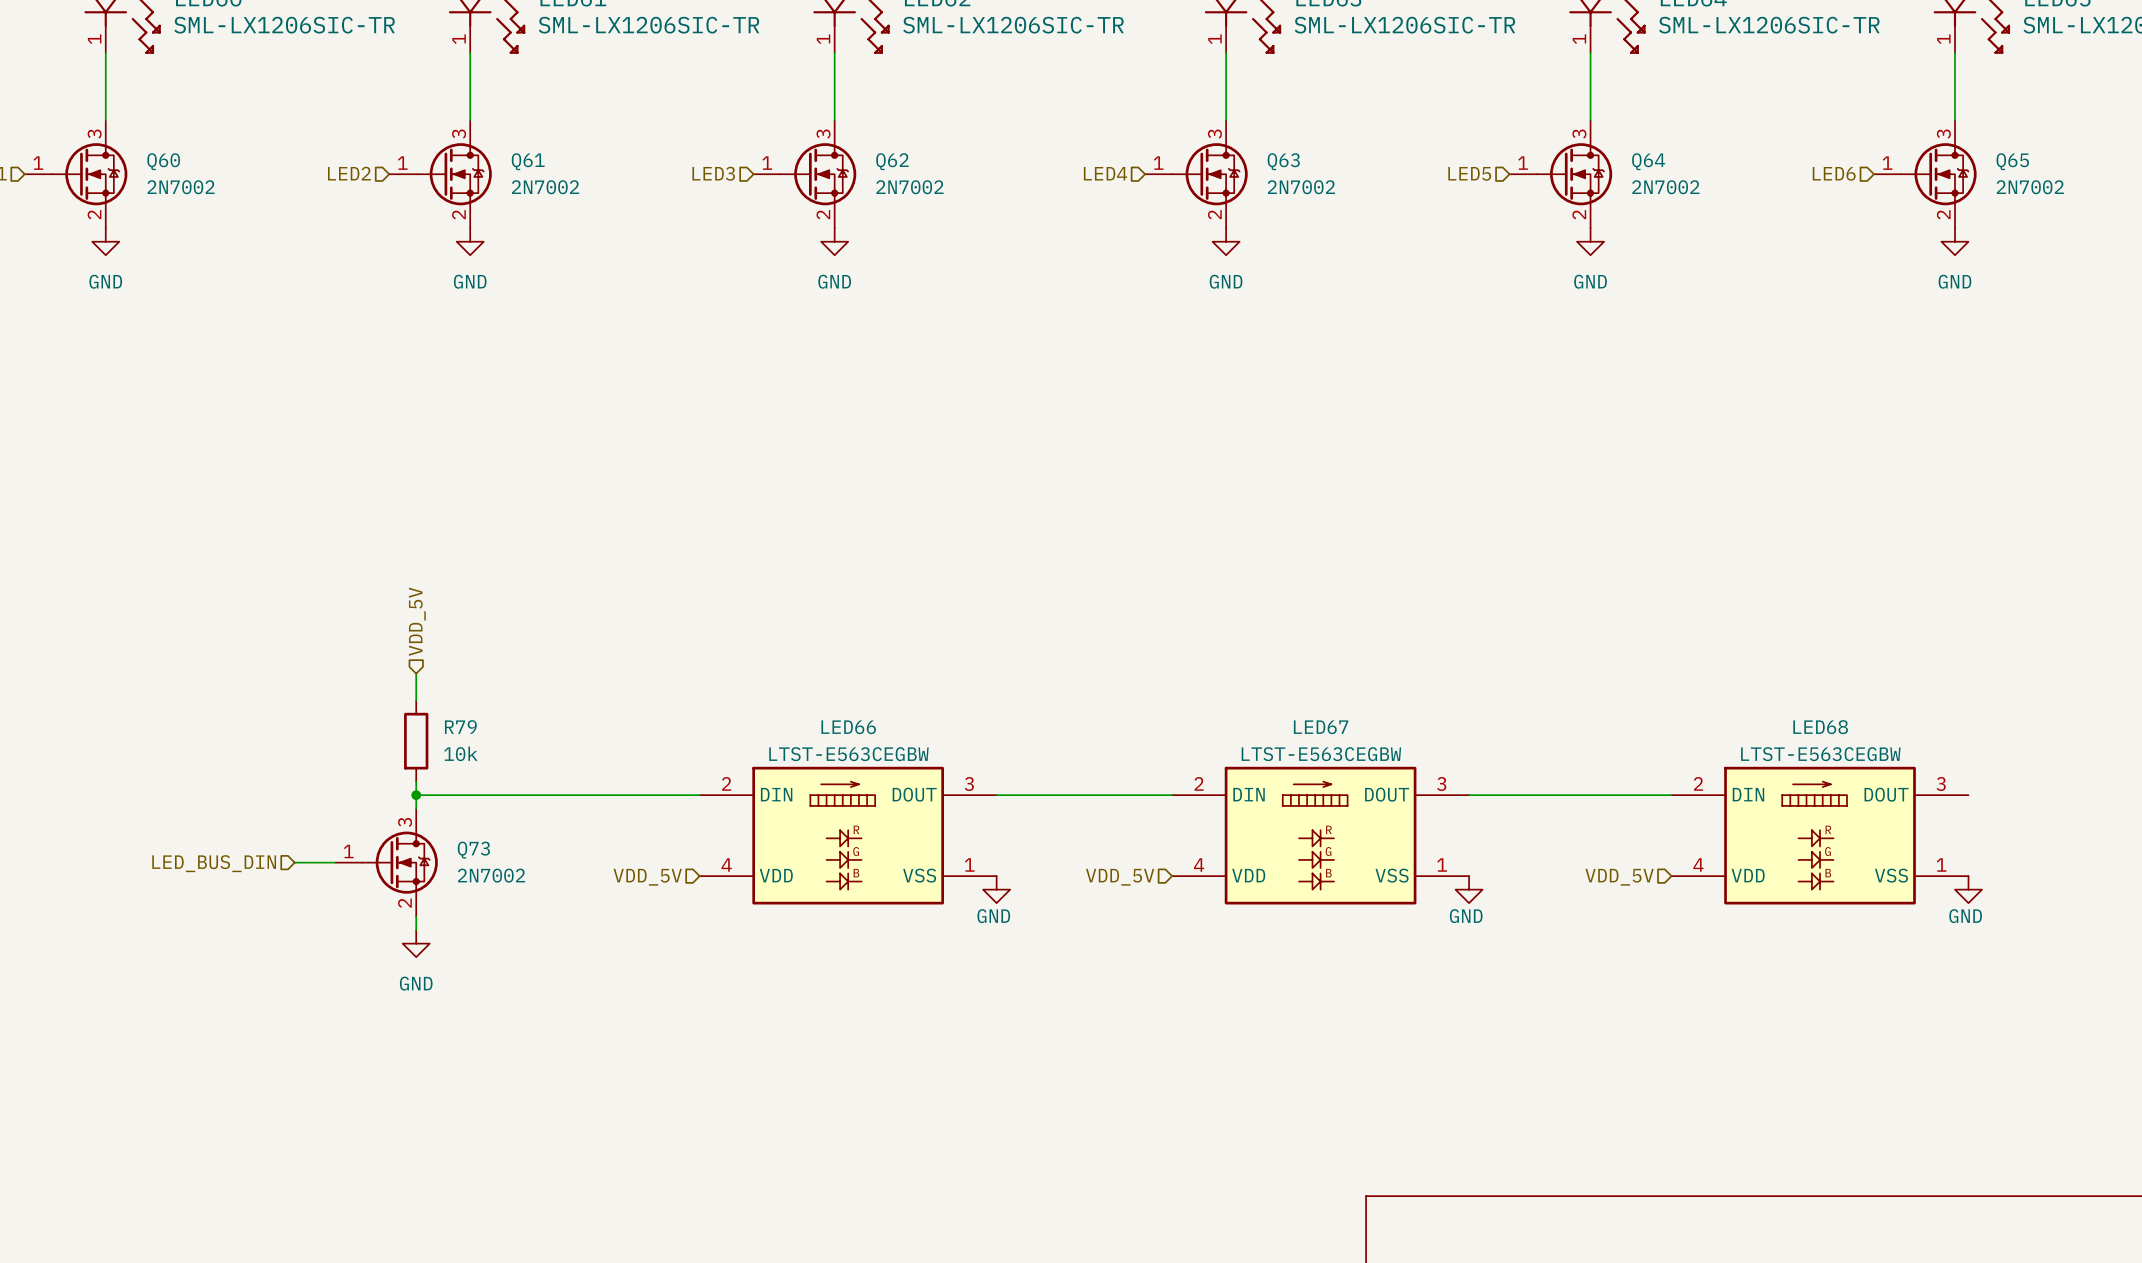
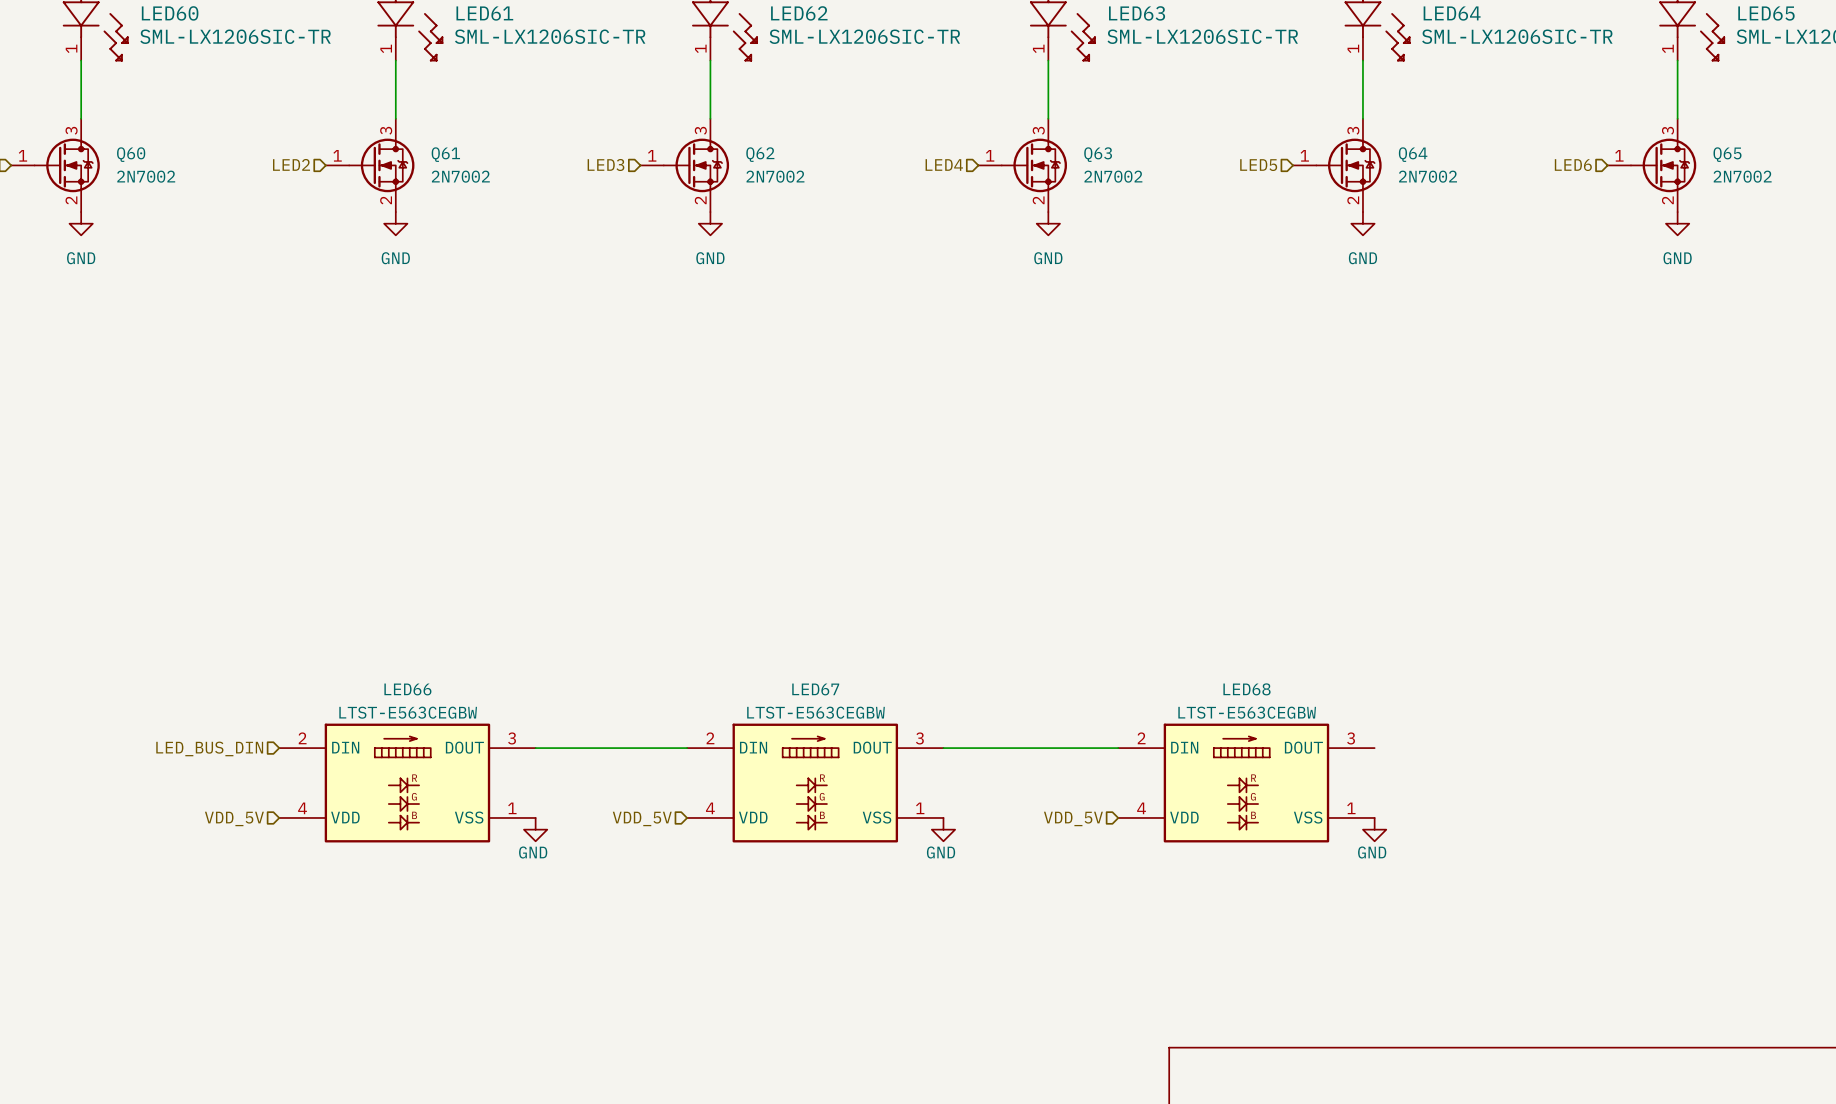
hierarchical label: VDD_5V (417, 621) -> none
wire: (416, 673) (416, 700) -> none
R79: 10k (416, 741) -> none
wire: (416, 781) (416, 808) -> none
wire: (416, 795) (699, 795) -> none
junction: (416, 795) -> none
wire: (996, 795) (1172, 795) -> none
wire: (1469, 795) (1671, 795) -> none
LED66 position: (848, 835) -> (407, 783)
LED67 position: (1320, 835) -> (815, 783)
LED68 position: (1820, 835) -> (1246, 783)
wire: none -> (535, 748) (687, 748)
wire: none -> (943, 748) (1118, 748)
wire: (294, 862) (335, 862) -> none
Q73: 2N7002 (386, 862) -> none
hierarchical label position: LED_BUS_DIN (214, 863) -> LED_BUS_DIN (209, 748)
hierarchical label position: VDD_5V (647, 877) -> VDD_5V (642, 818)
hierarchical label position: VDD_5V (1120, 877) -> VDD_5V (1073, 818)
hierarchical label: VDD_5V (1619, 877) -> none
power symbol position: GND (996, 889) -> GND (943, 829)
power symbol position: GND (1469, 889) -> GND (1374, 829)
power symbol: GND (1968, 889) -> none
hierarchical label: none -> VDD_5V (234, 818)
power symbol: GND (416, 943) -> none
power symbol: none -> GND (535, 829)

